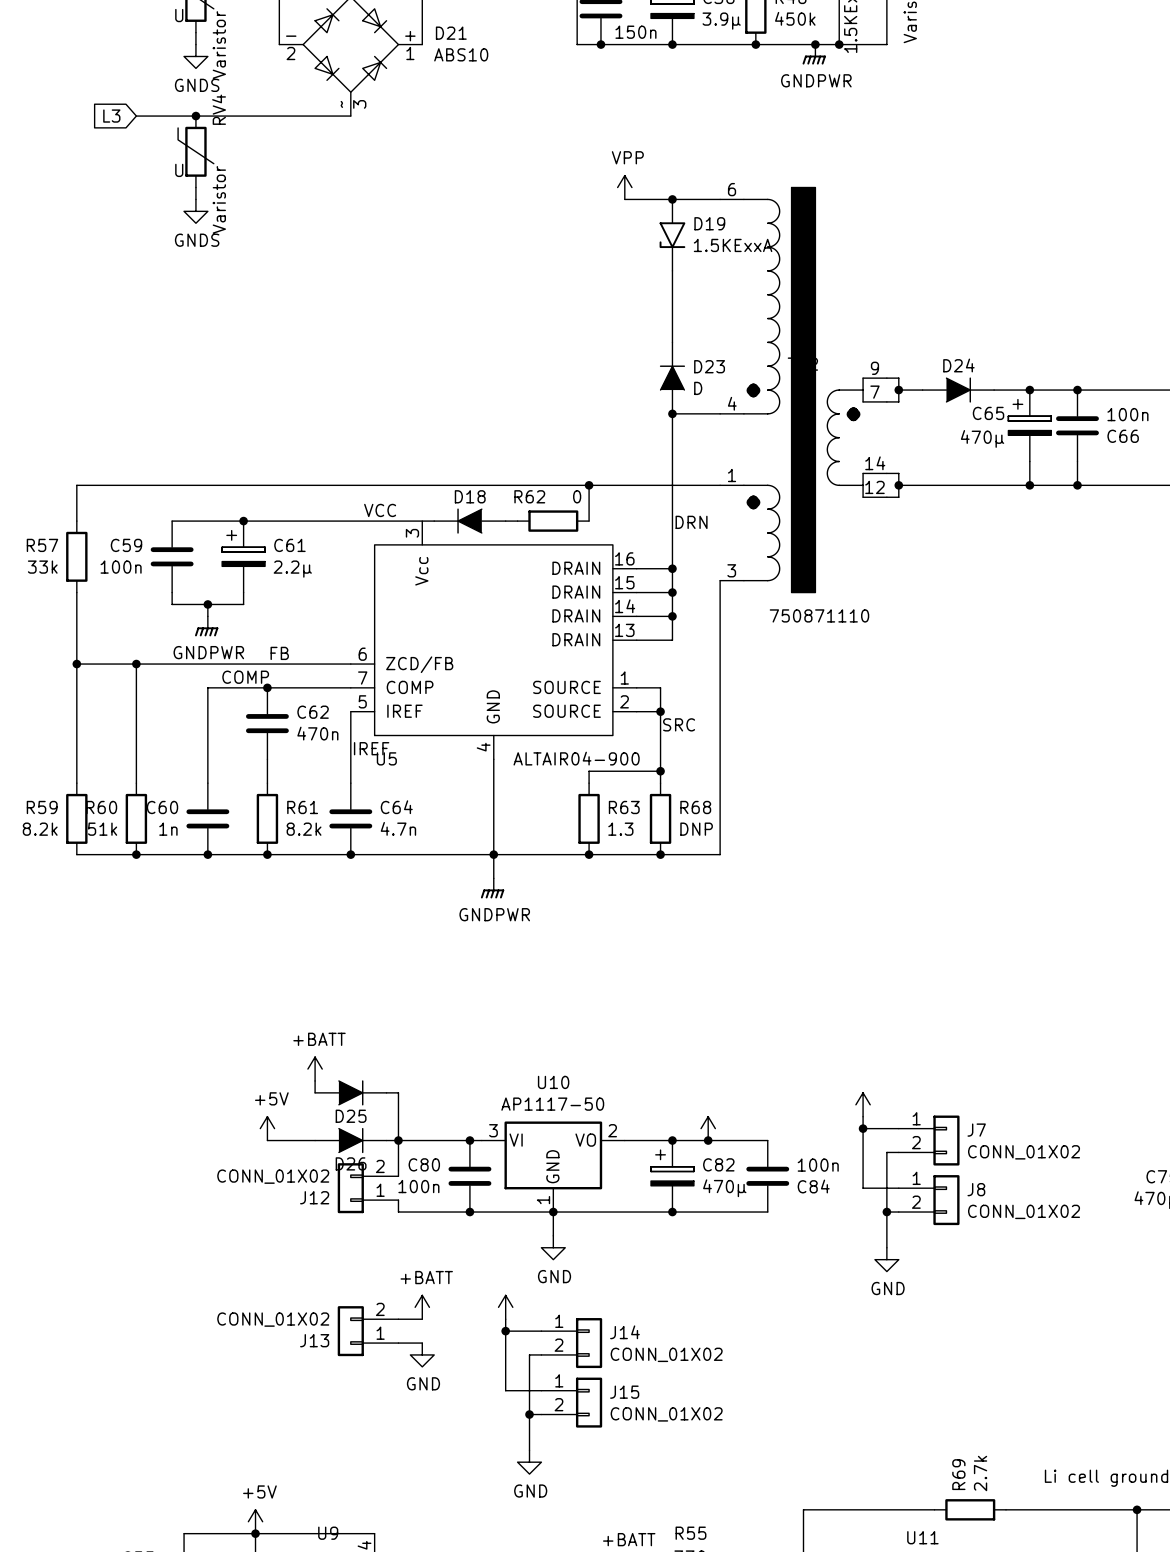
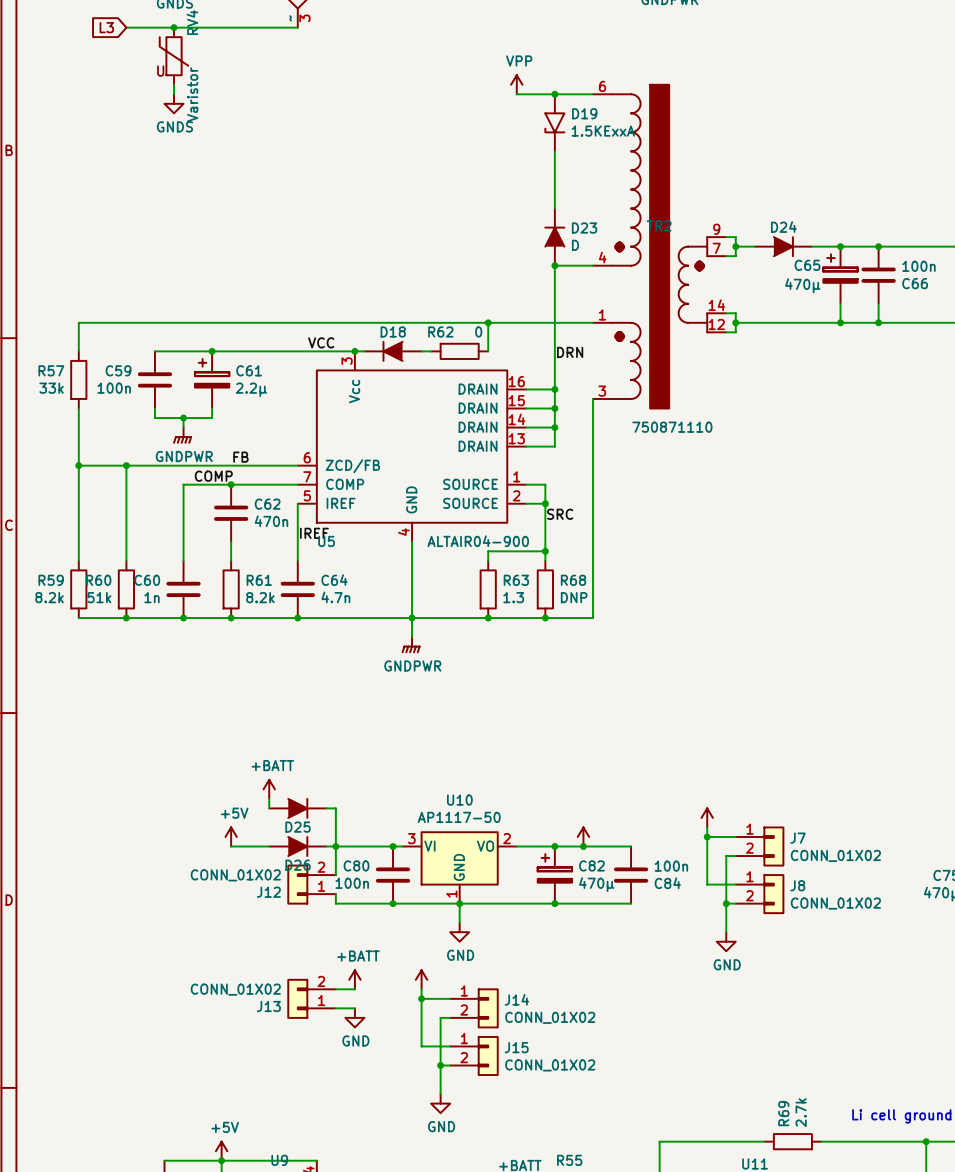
junction: none -> (354, 351)

